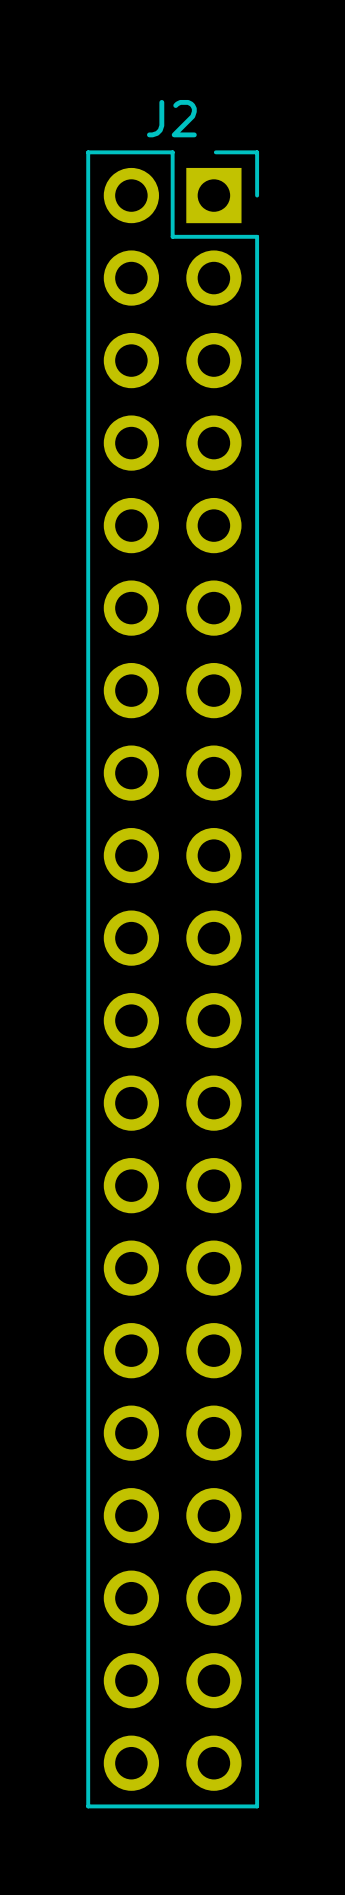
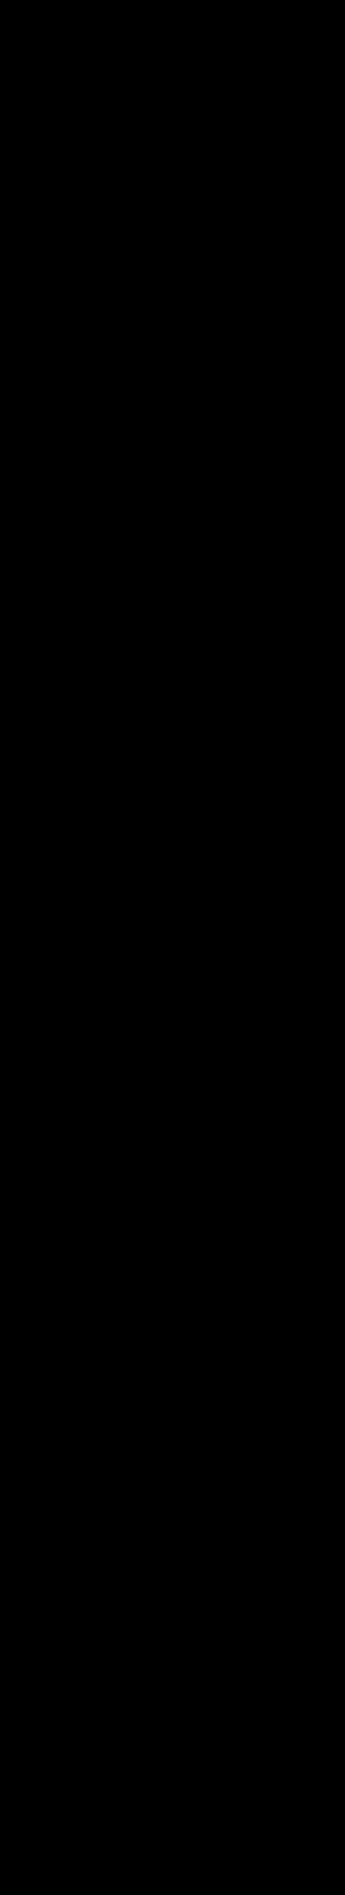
J2: (172, 979) -> none

